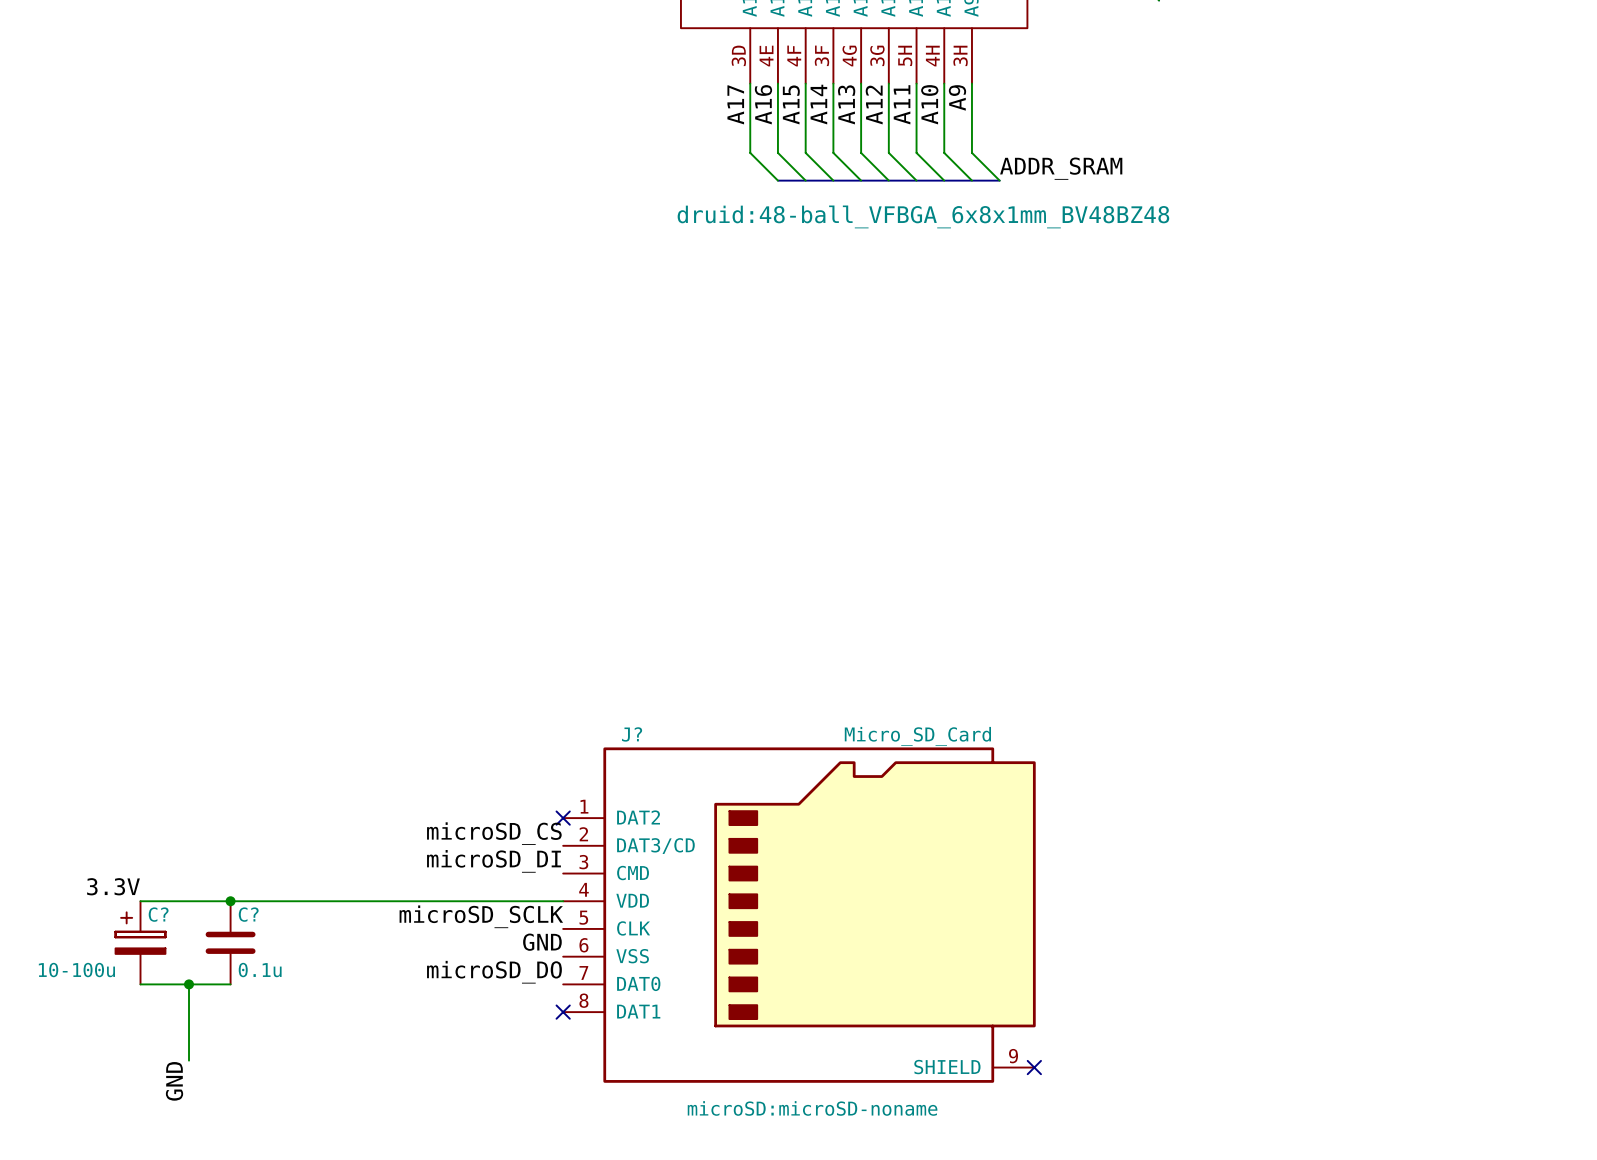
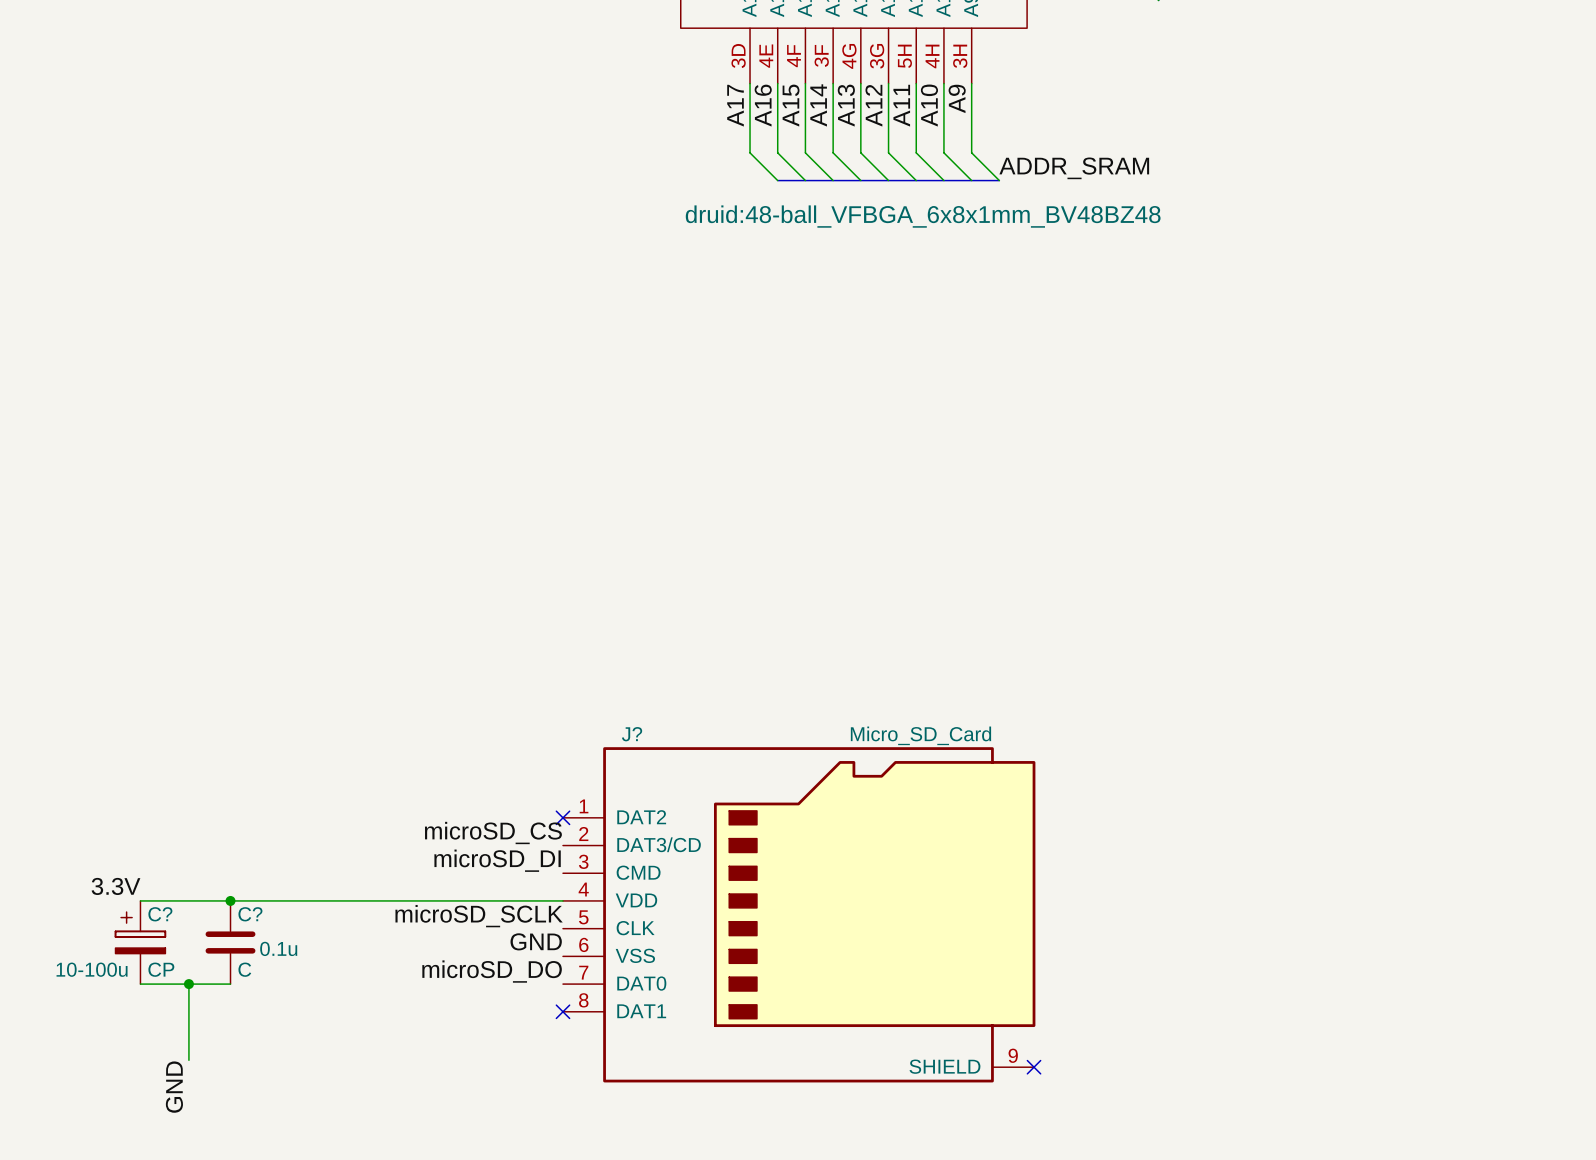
C? text: none -> 0.1u (278, 948)
C? value: 10-100u (76, 970) -> CP (161, 969)
C? text: none -> 10-100u (92, 969)
C? value: 0.1u (260, 970) -> C (244, 969)
J? text: microSD:microSD-noname (812, 1108) -> none

